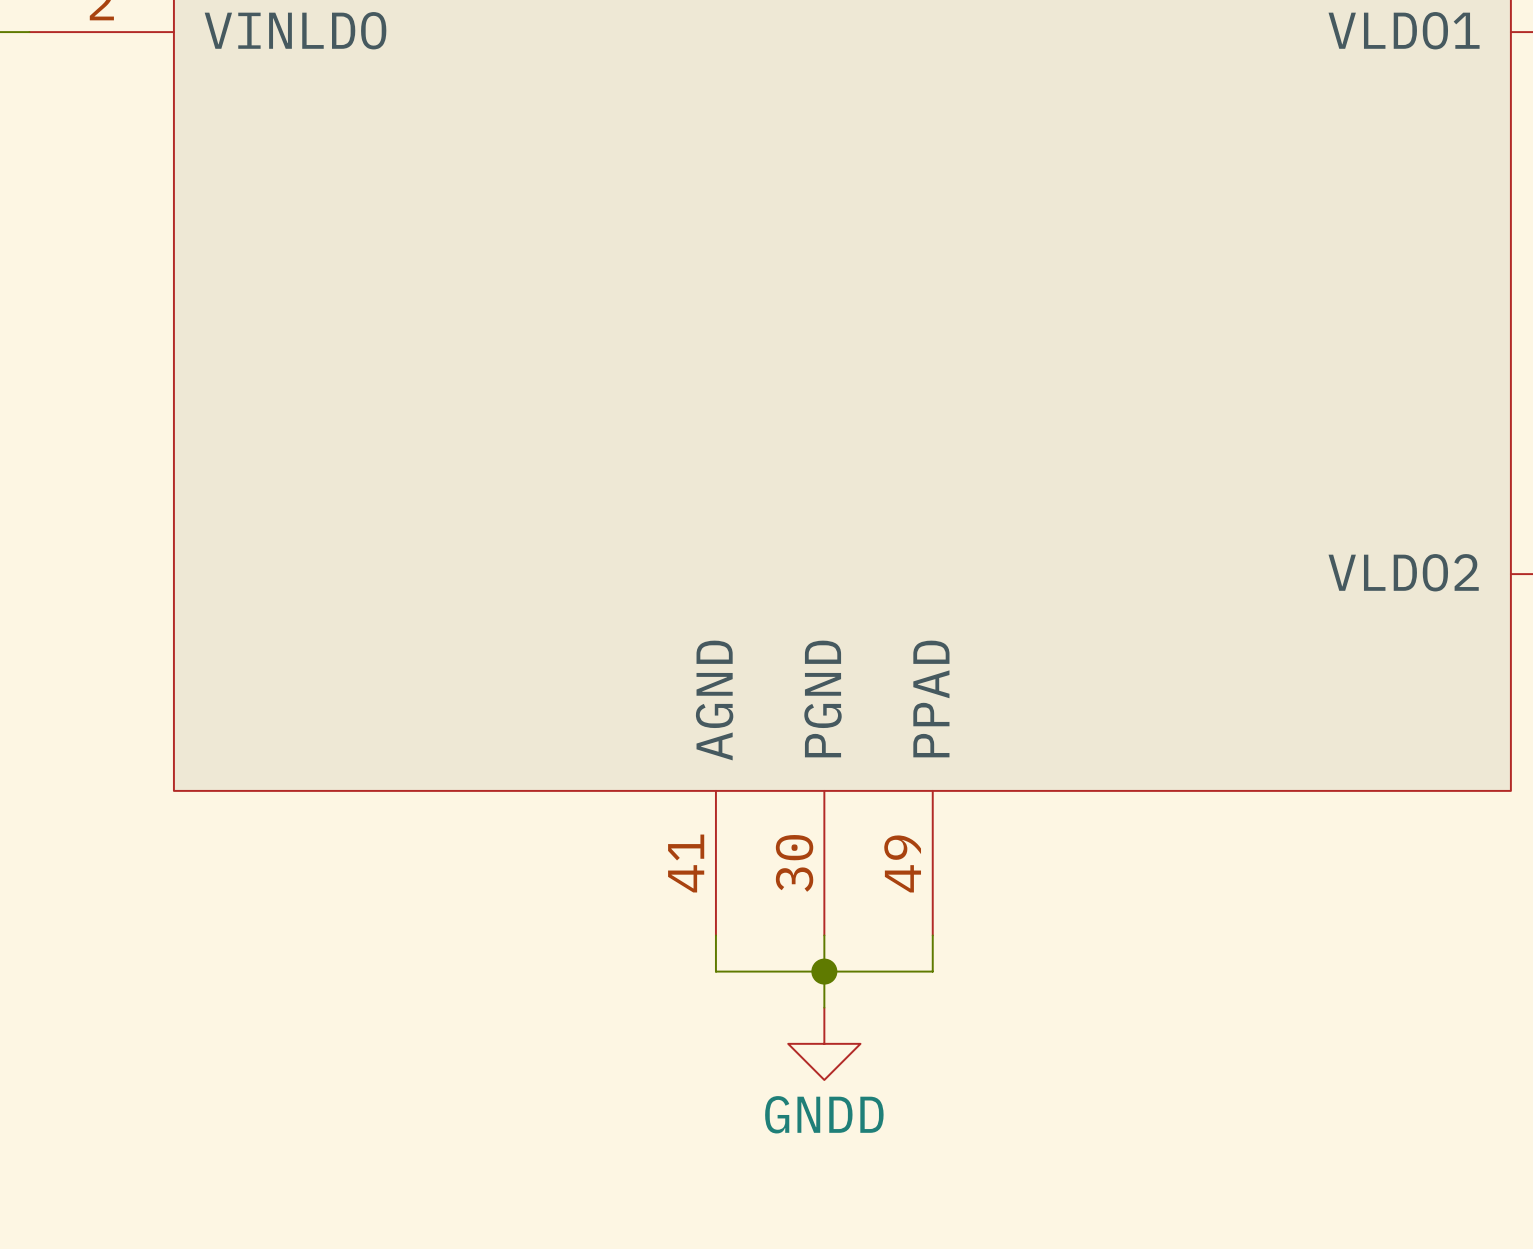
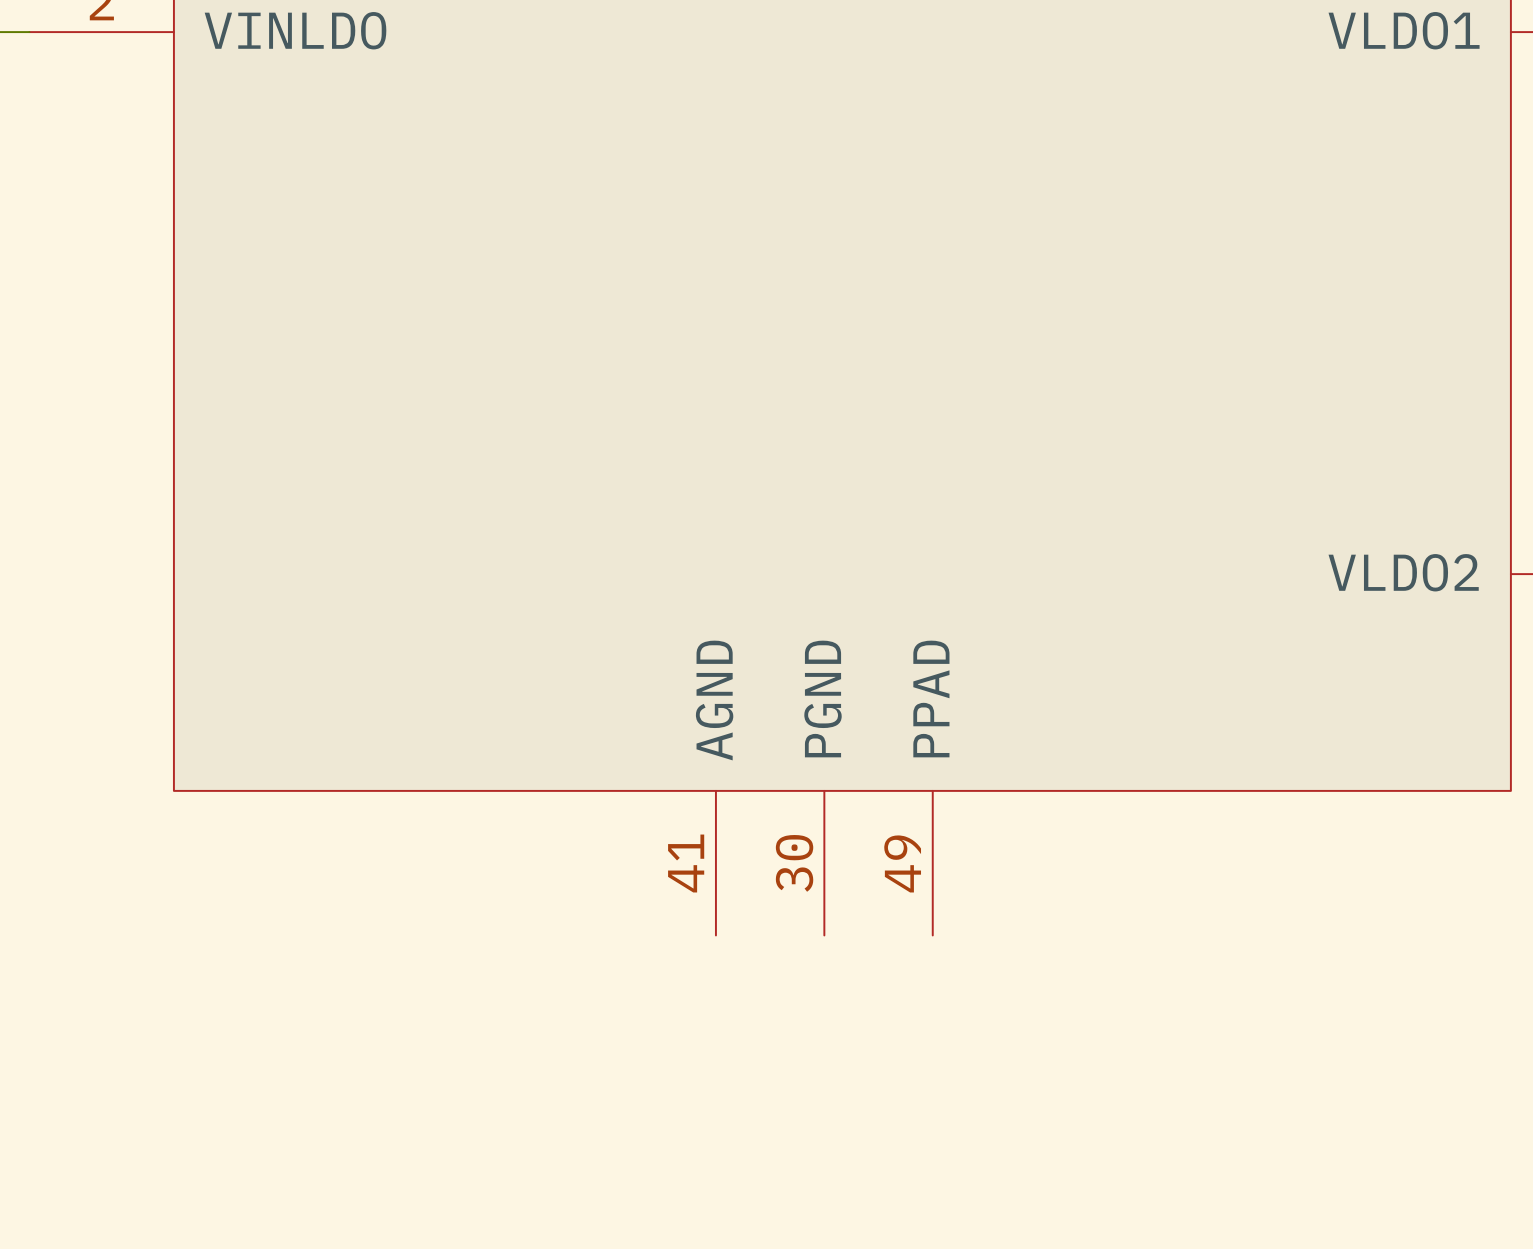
wire: (715, 935) (715, 971) (932, 971) (932, 935) -> none
wire: (824, 935) (824, 1007) -> none
junction: (824, 971) -> none
power symbol: GNDD (824, 1043) -> none

